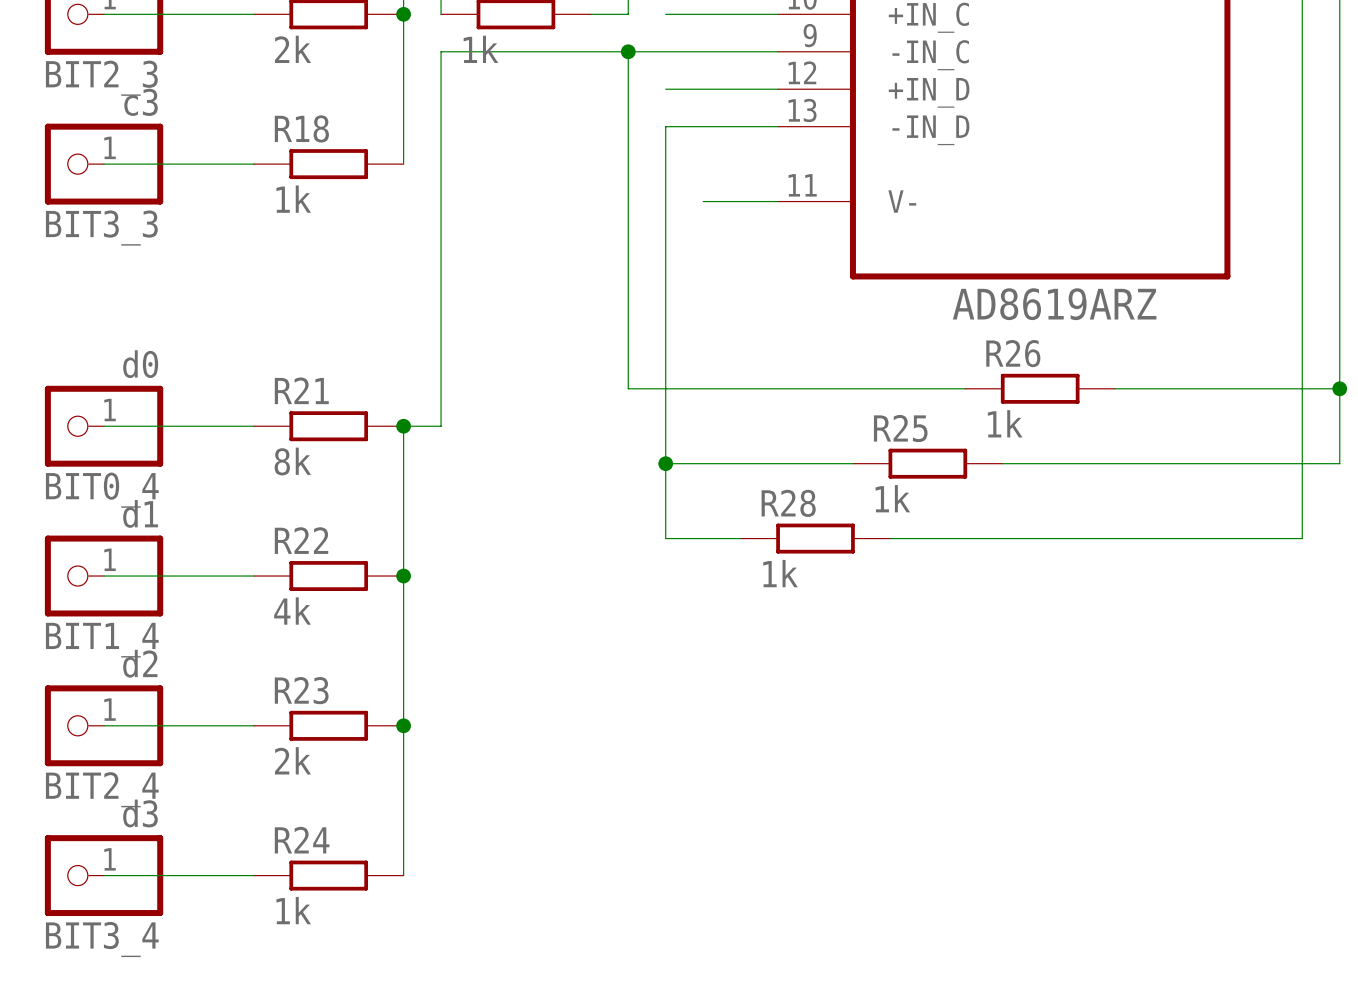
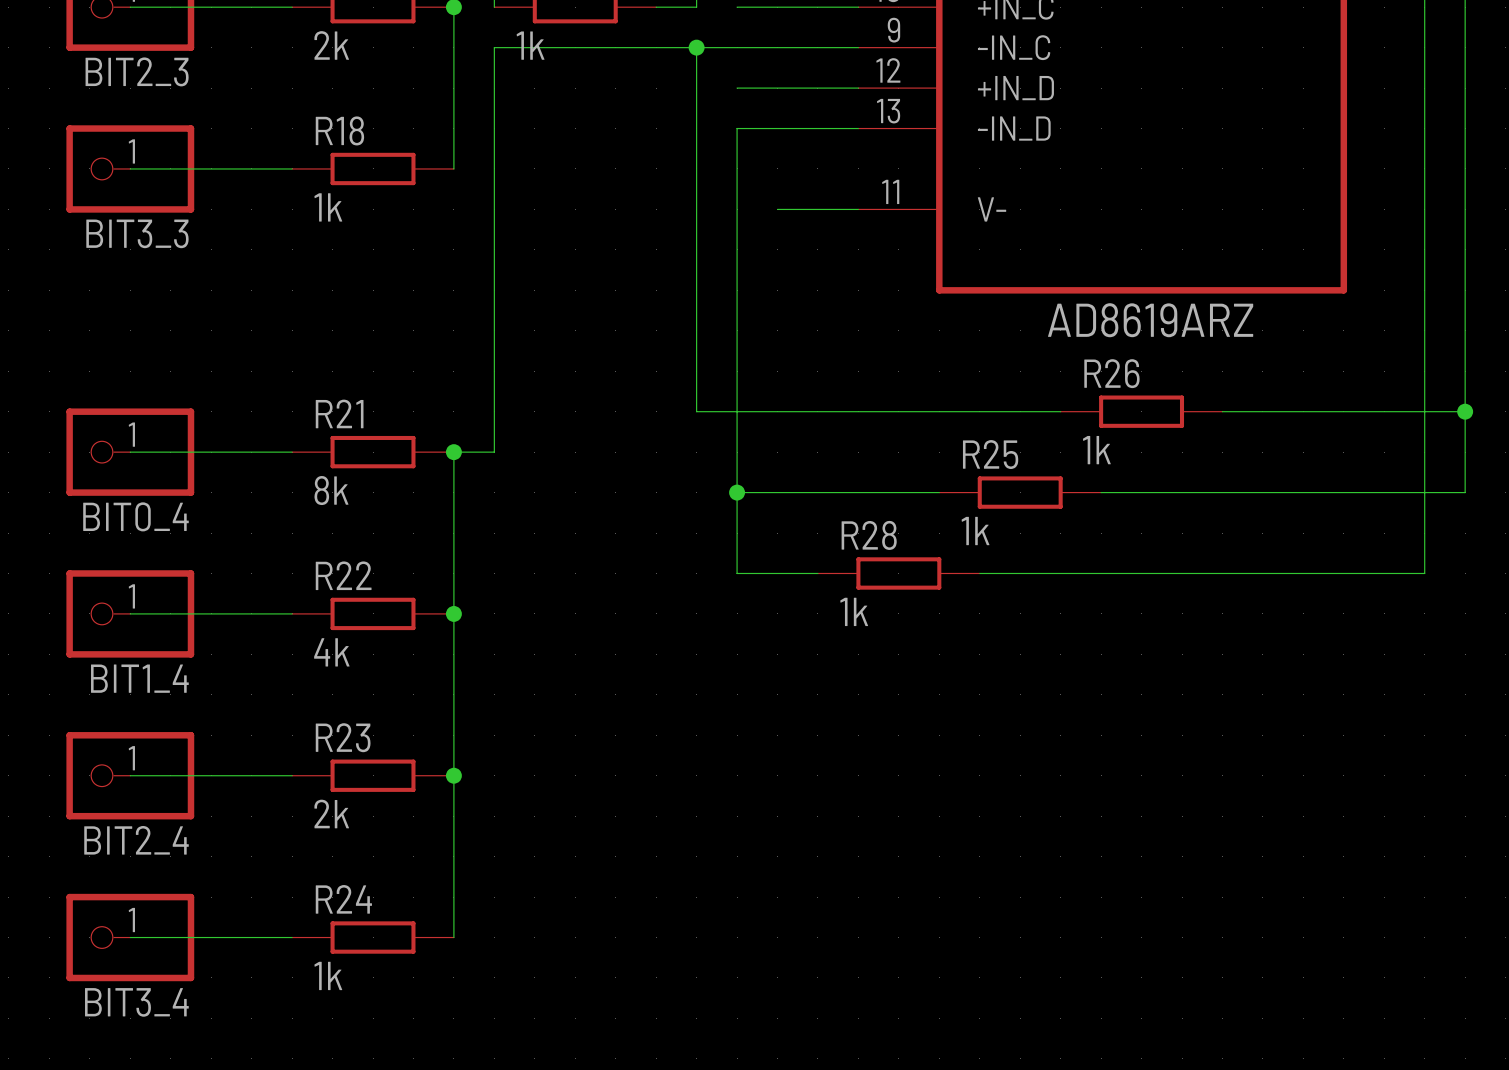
BIT3_3 value: c3 (141, 102) -> none
BIT0_4 value: d0 (140, 364) -> none
BIT1_4 value: d1 (140, 513) -> none
BIT2_4 value: d2 (140, 663) -> none
BIT3_4 value: d3 (140, 813) -> none

